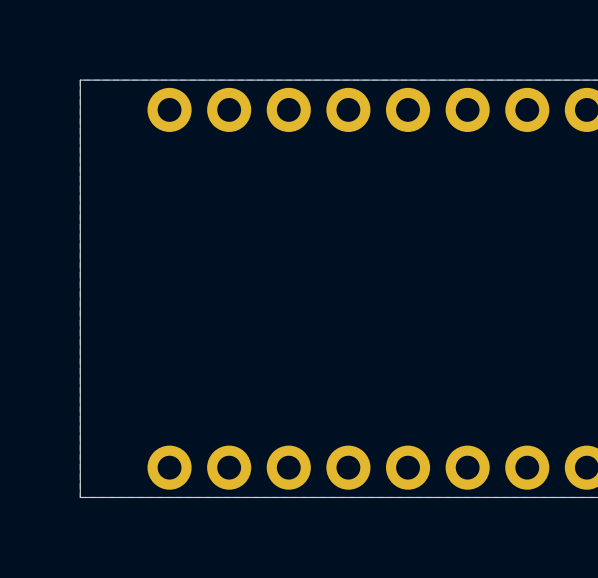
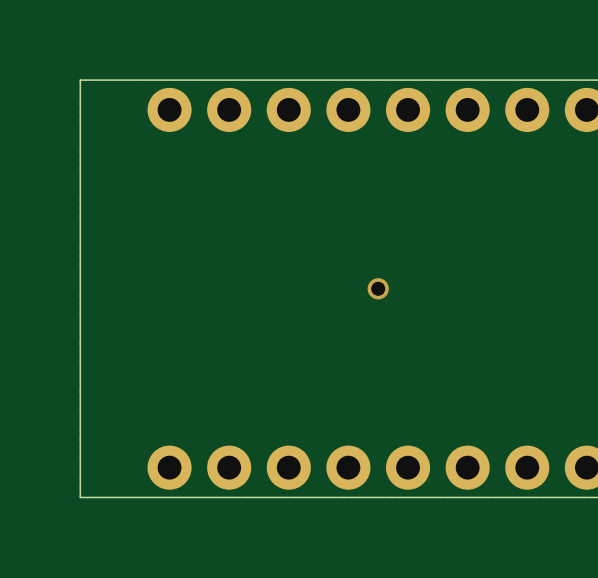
via: none -> (378, 288)

